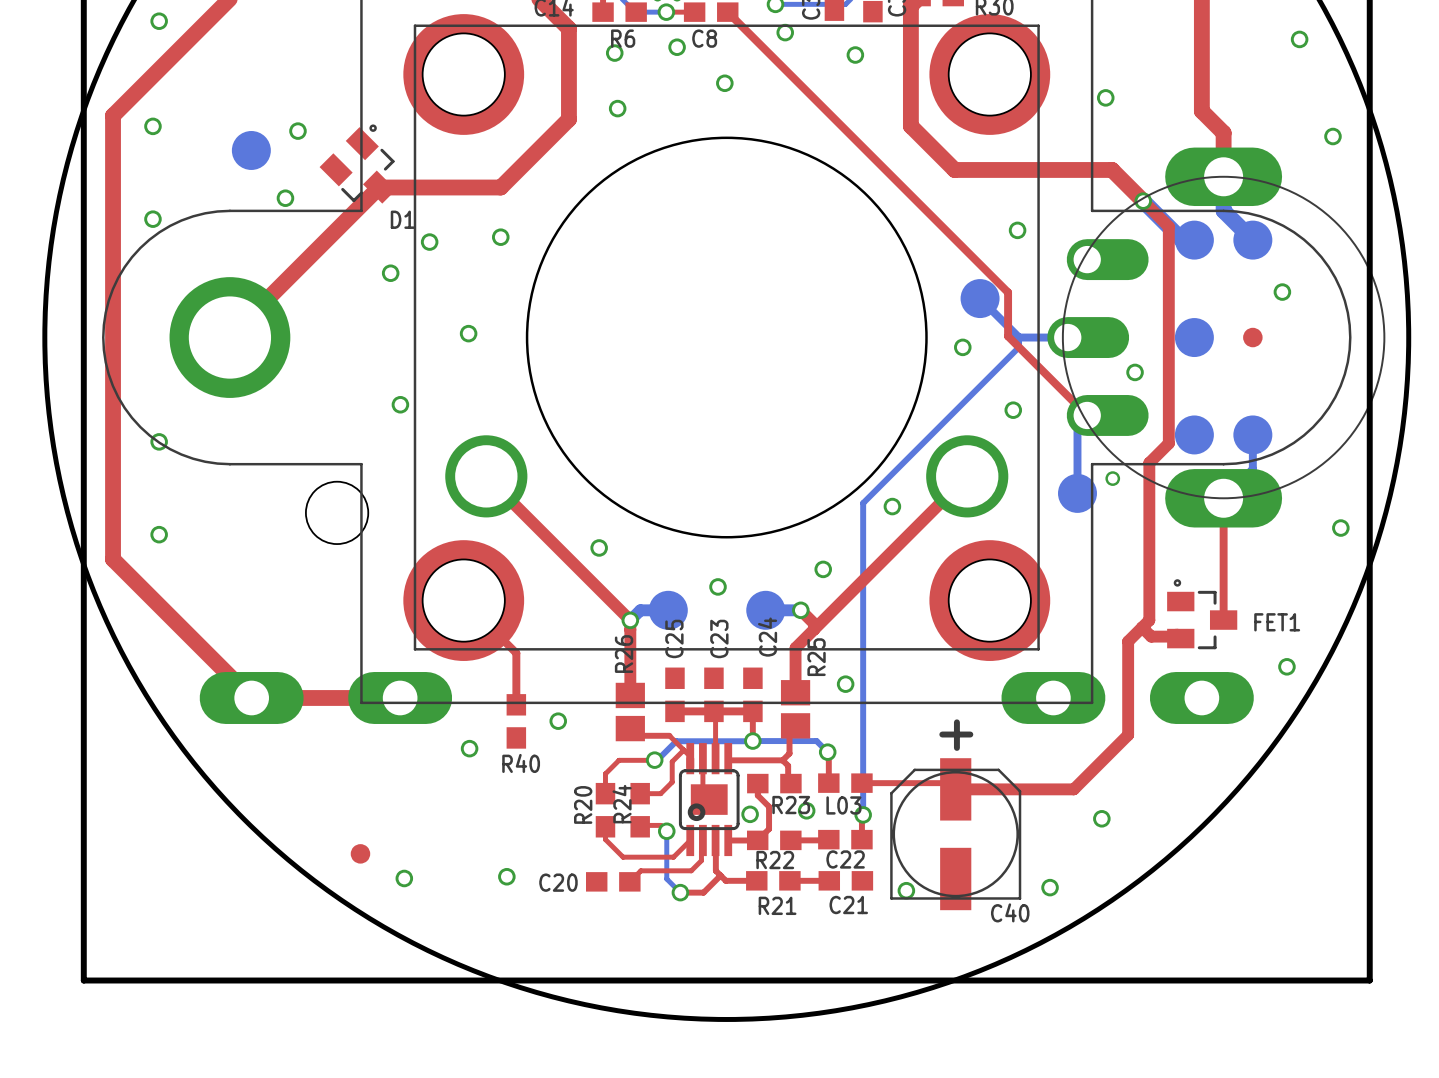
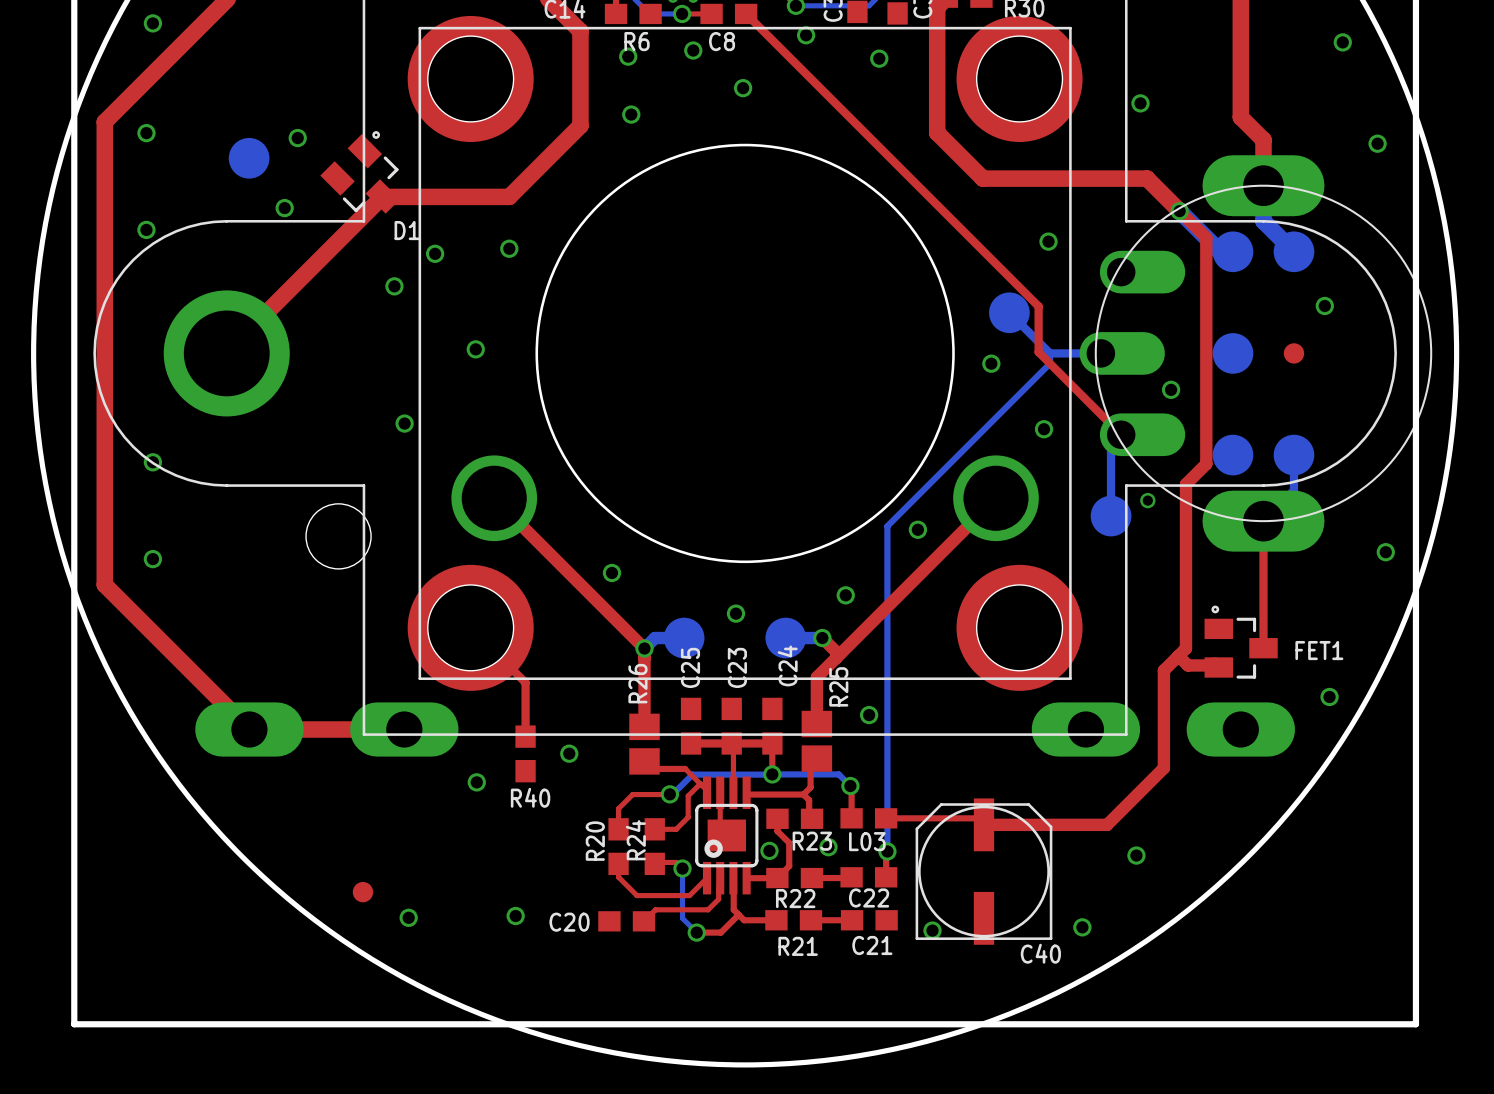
line: (956, 722) (956, 747) -> none
line: (942, 734) (970, 734) -> none
C40 footprint: [890, 758, 1022, 911] -> [915, 798, 1053, 945]

